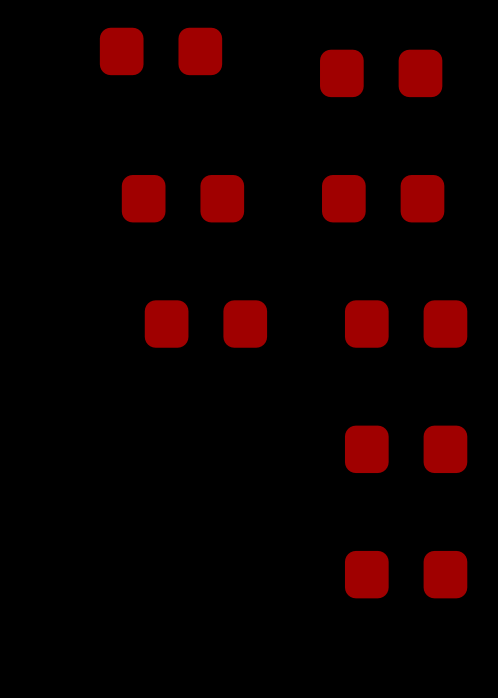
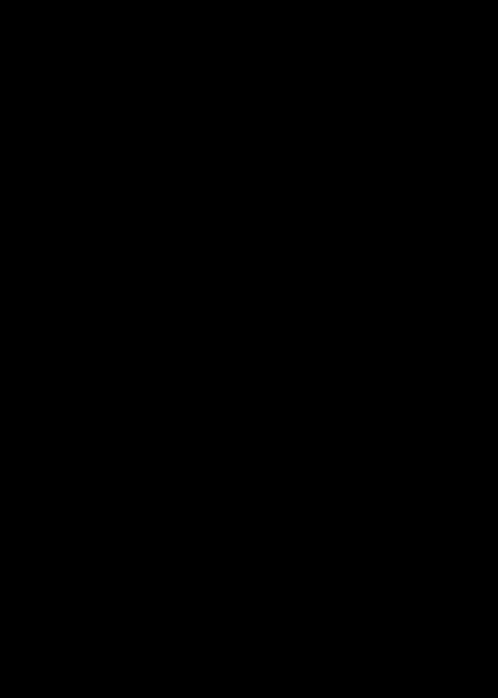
part: (161, 51) -> none
part: (381, 73) -> none
part: (182, 198) -> none
part: (383, 198) -> none
part: (205, 324) -> none
part: (406, 324) -> none
part: (406, 449) -> none
part: (406, 574) -> none

